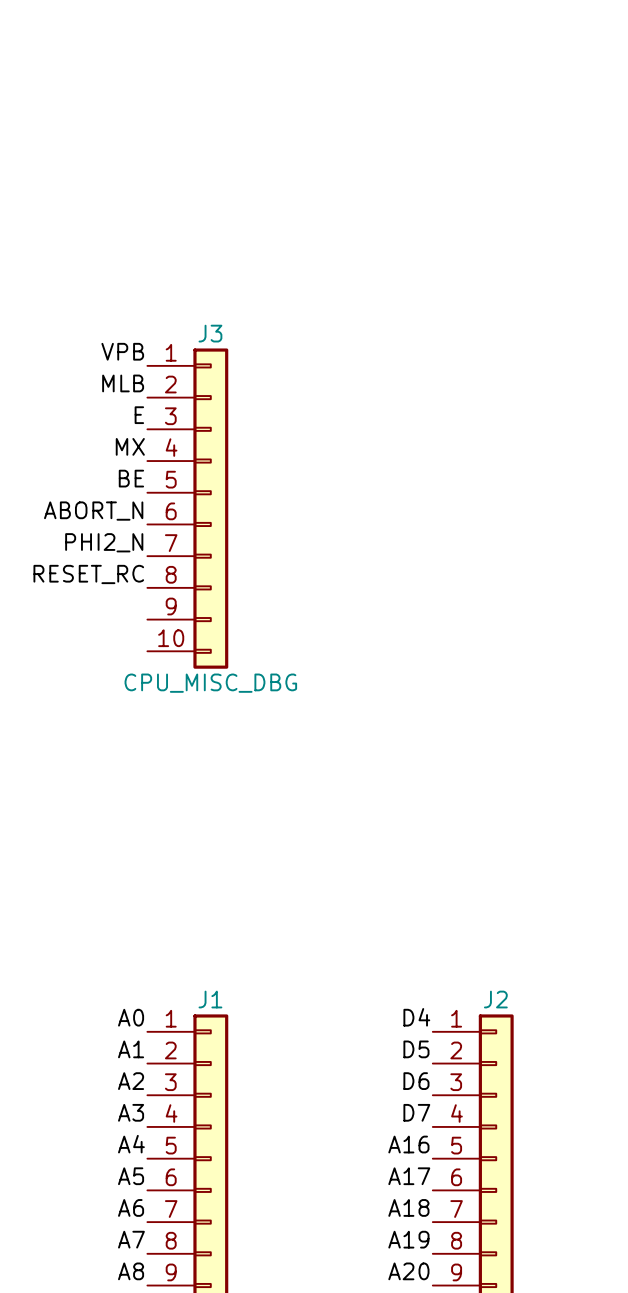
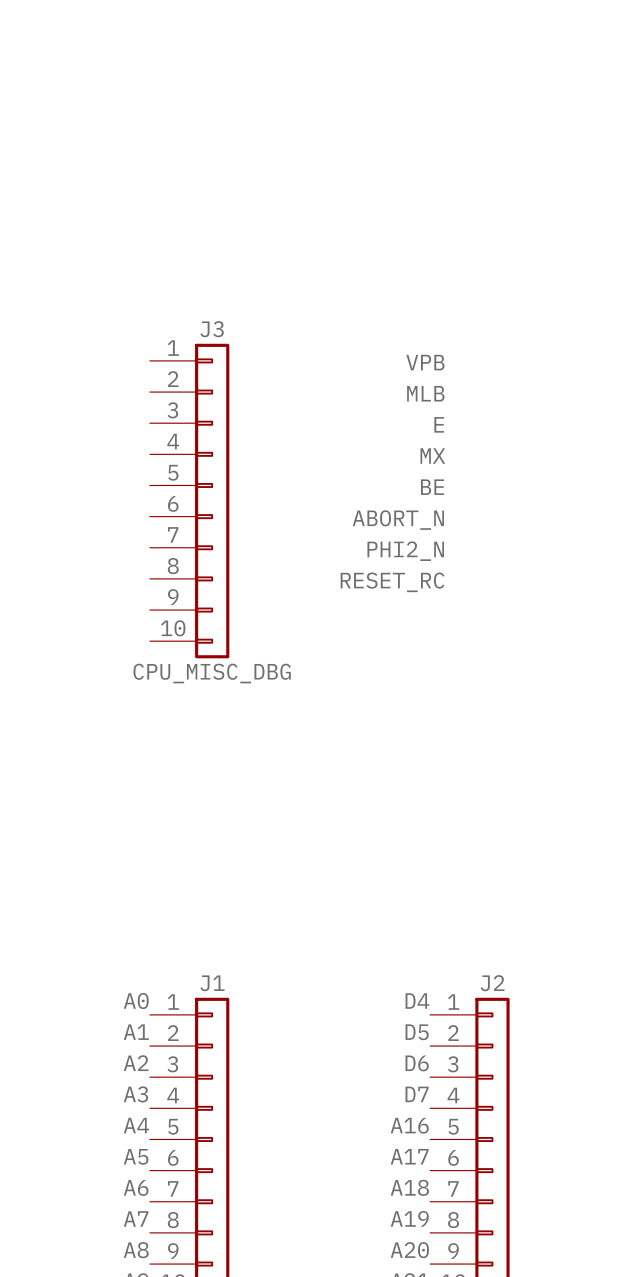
label position: VPB (122, 351) -> VPB (425, 362)
label position: MLB (123, 383) -> MLB (425, 393)
label position: E (139, 415) -> E (439, 424)
label position: MX (130, 446) -> MX (432, 456)
label position: BE (131, 478) -> BE (432, 487)
label position: ABORT_N (93, 511) -> ABORT_N (398, 520)
label position: PHI2_N (104, 542) -> PHI2_N (405, 551)
label position: RESET_RC (88, 574) -> RESET_RC (392, 582)

